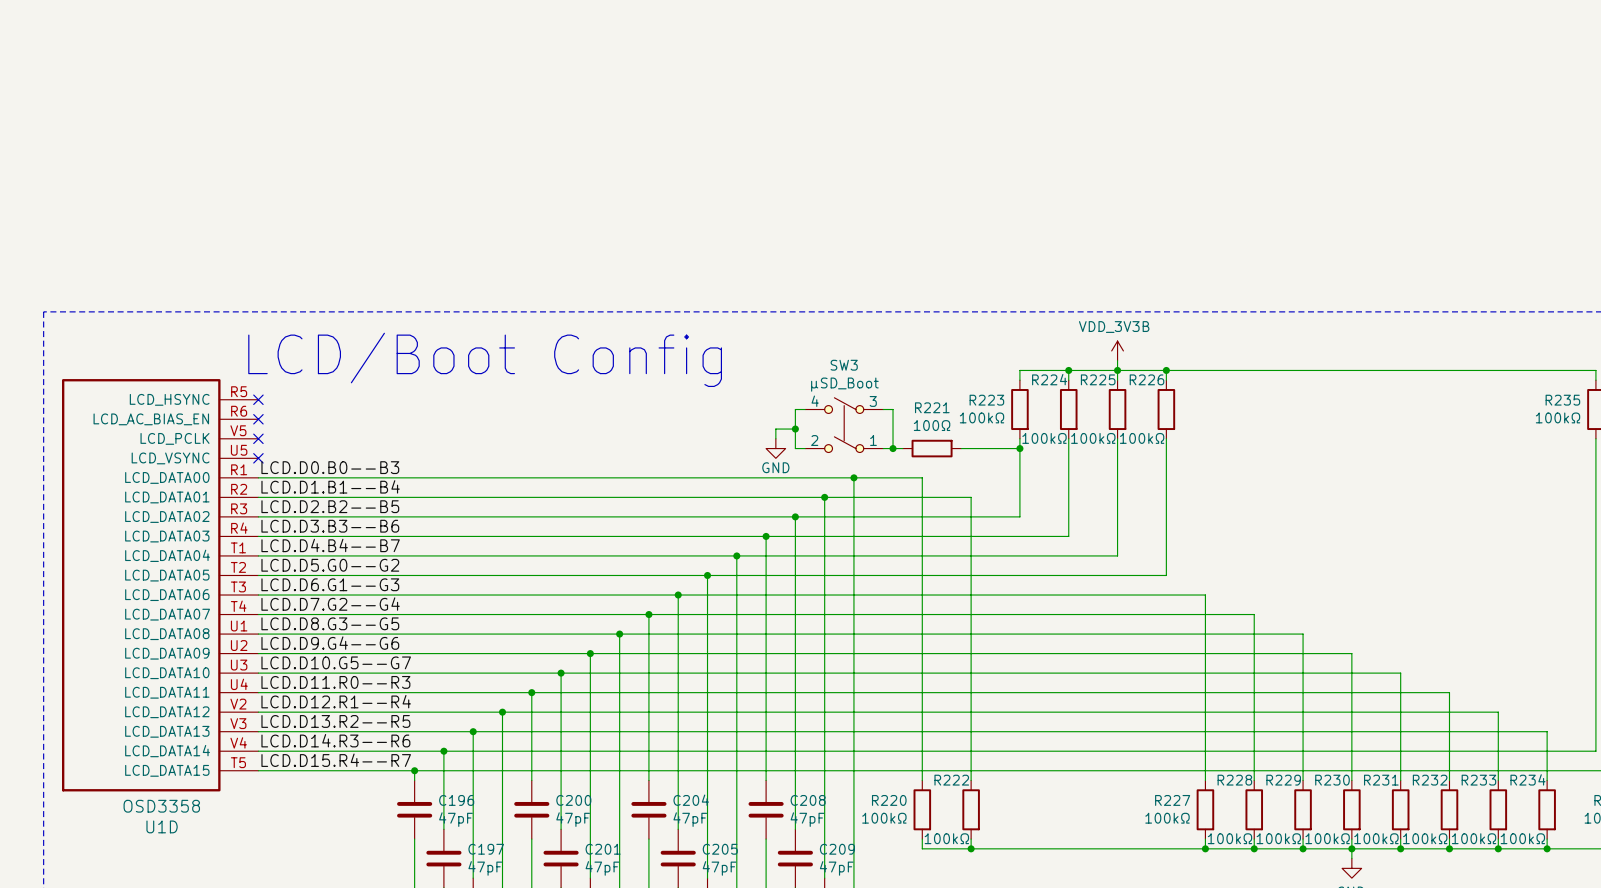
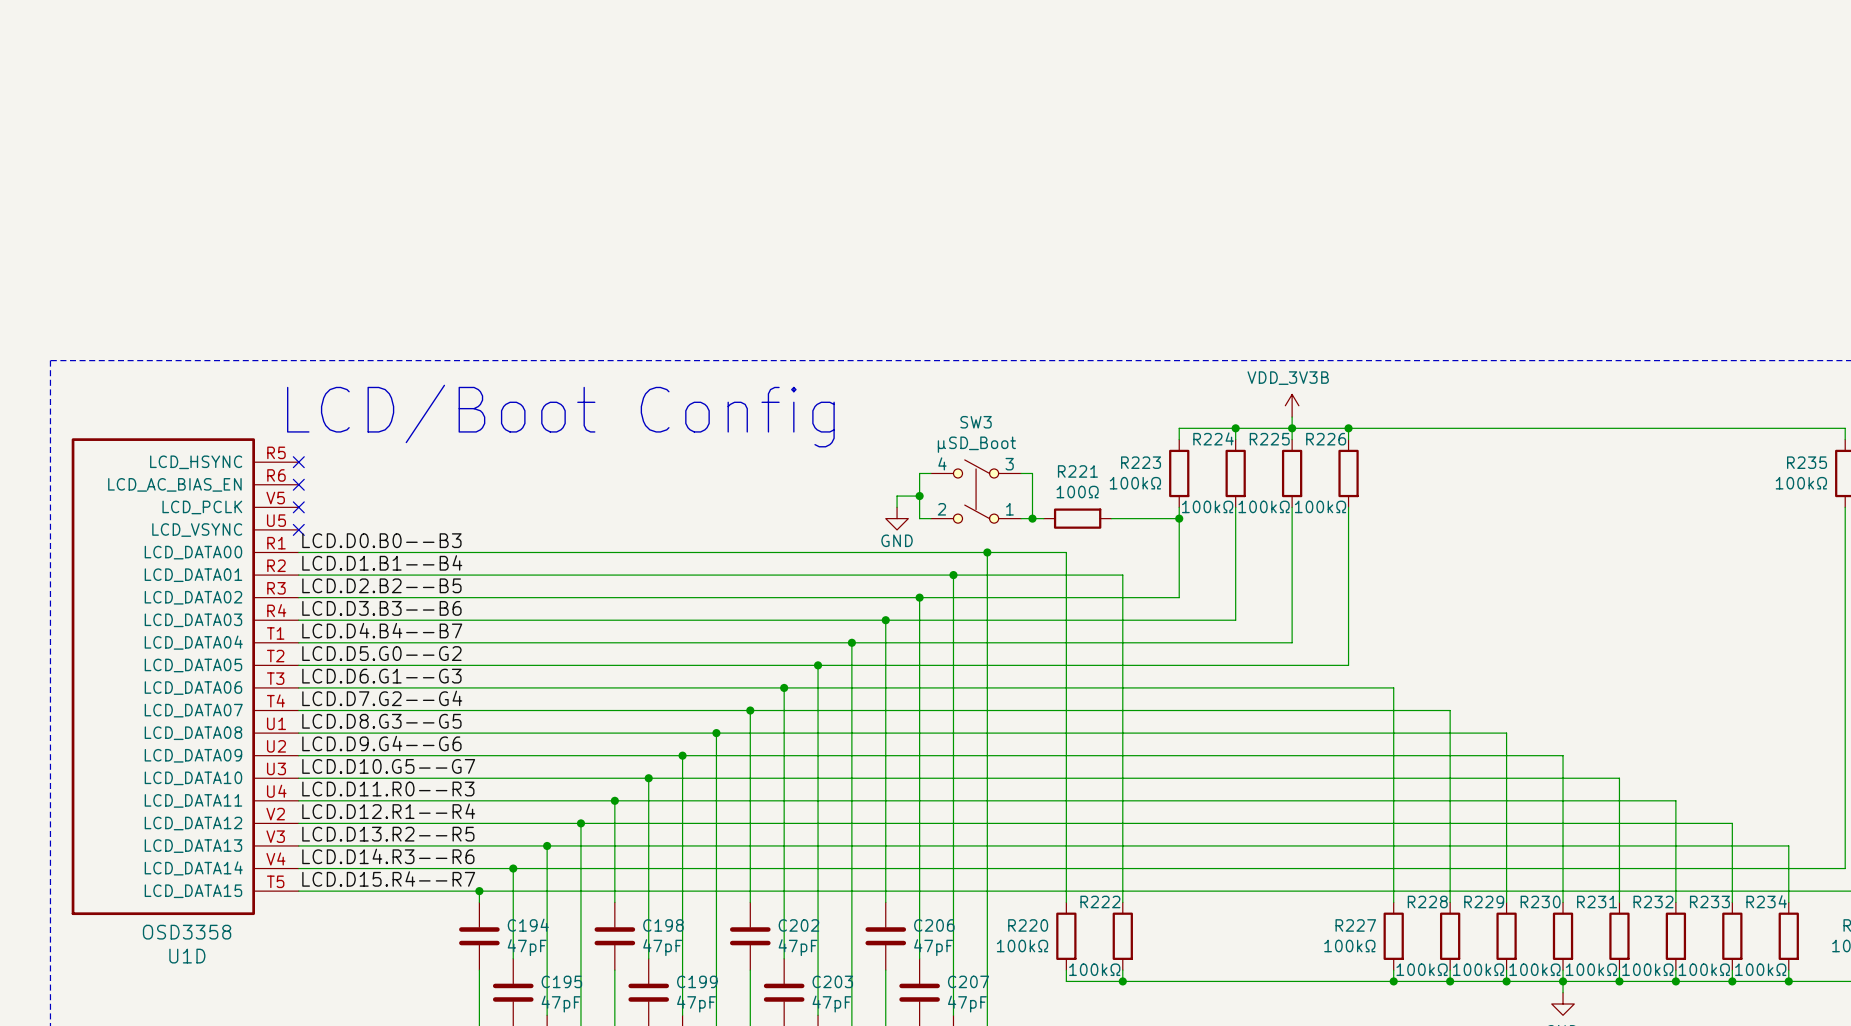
C196 name: C196 (456, 800) -> C194 (528, 925)
C200 name: C200 (573, 800) -> C198 (663, 925)
C204 name: C204 (691, 800) -> C202 (798, 925)
C208 name: C208 (808, 800) -> C206 (934, 925)
C197 name: C197 (486, 849) -> C195 (561, 981)
C201 name: C201 (603, 849) -> C199 (697, 981)
C205 name: C205 (720, 849) -> C203 (832, 981)
C209 name: C209 (837, 849) -> C207 (968, 981)

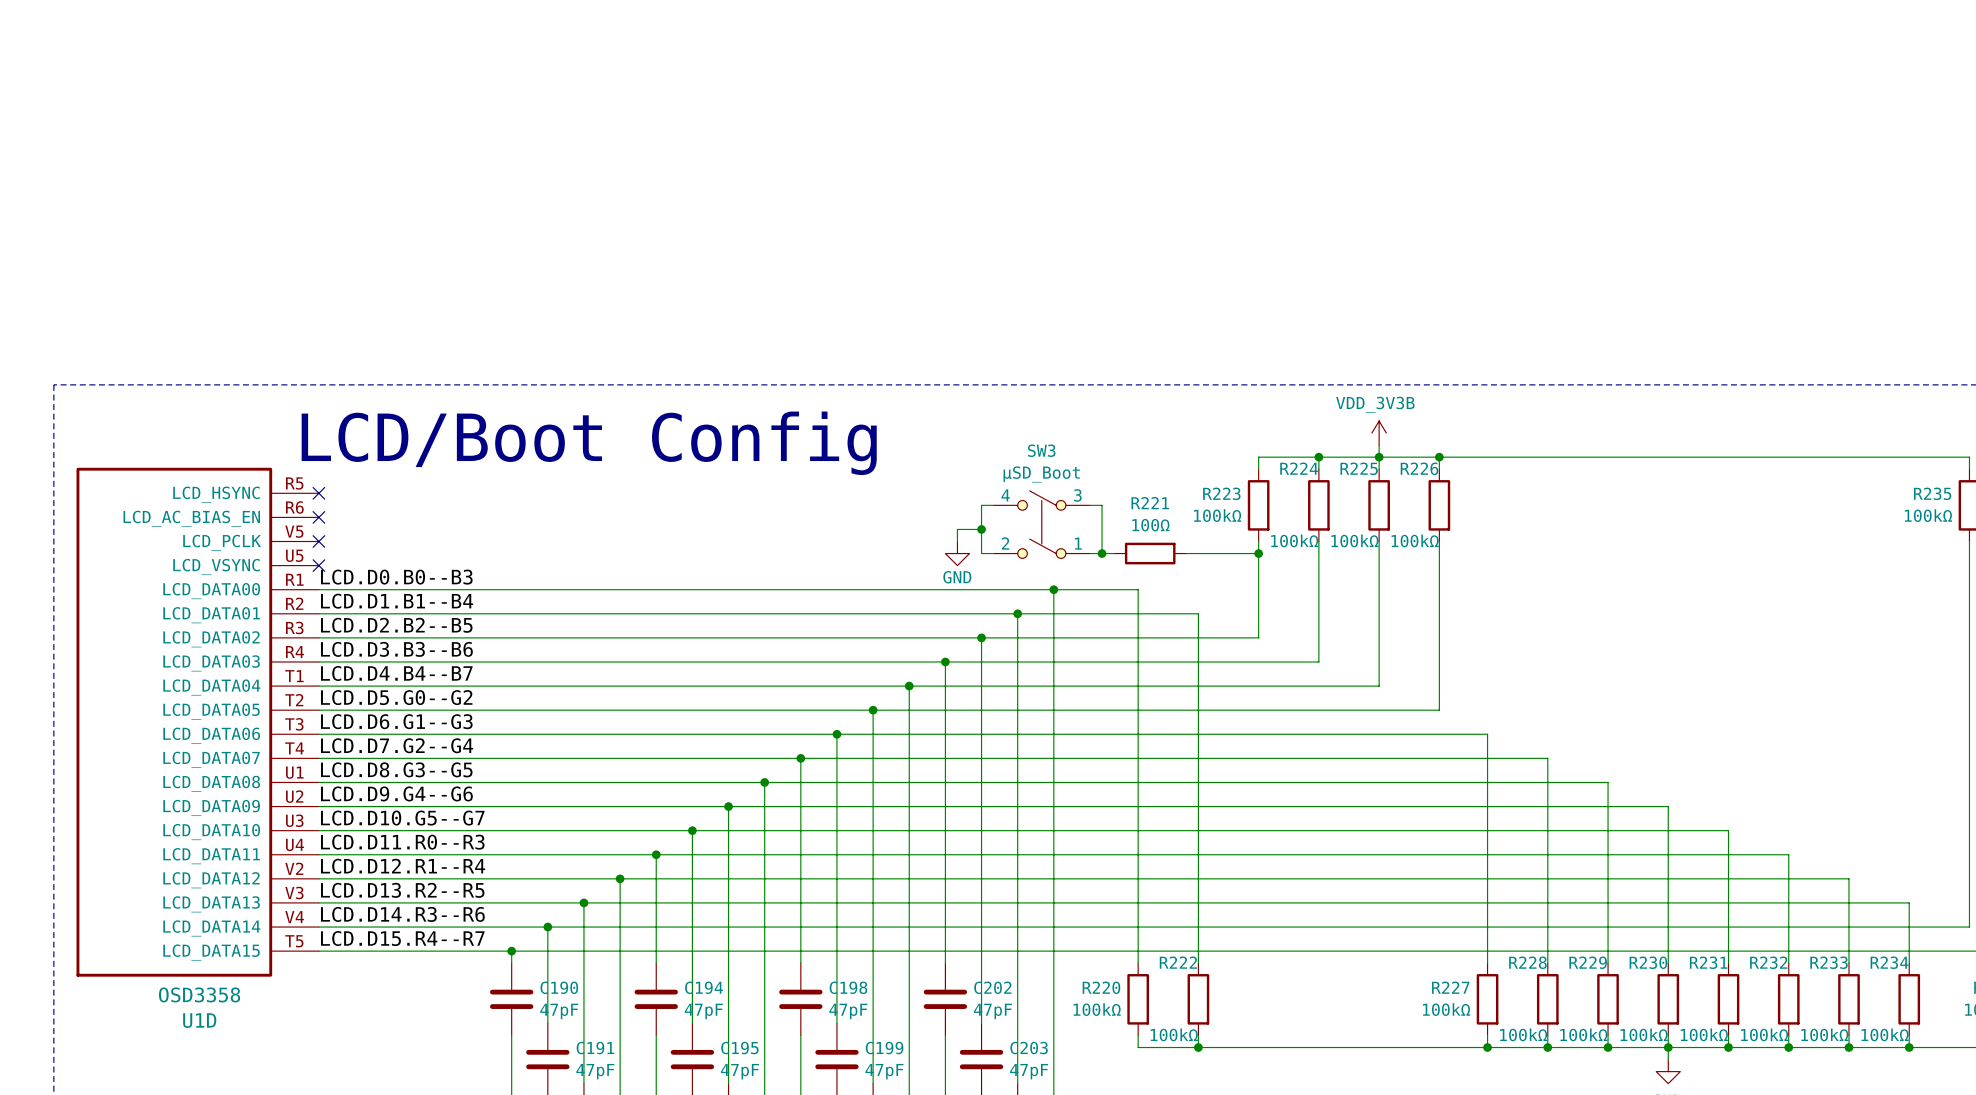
C194 name: C194 (528, 925) -> C190 (559, 987)
C198 name: C198 (663, 925) -> C194 (704, 987)
C202 name: C202 (798, 925) -> C198 (848, 987)
C206 name: C206 (934, 925) -> C202 (992, 987)
C195 name: C195 (561, 981) -> C191 (595, 1048)
C199 name: C199 (697, 981) -> C195 (739, 1048)
C203 name: C203 (832, 981) -> C199 (884, 1048)
C207 name: C207 (968, 981) -> C203 (1029, 1048)

